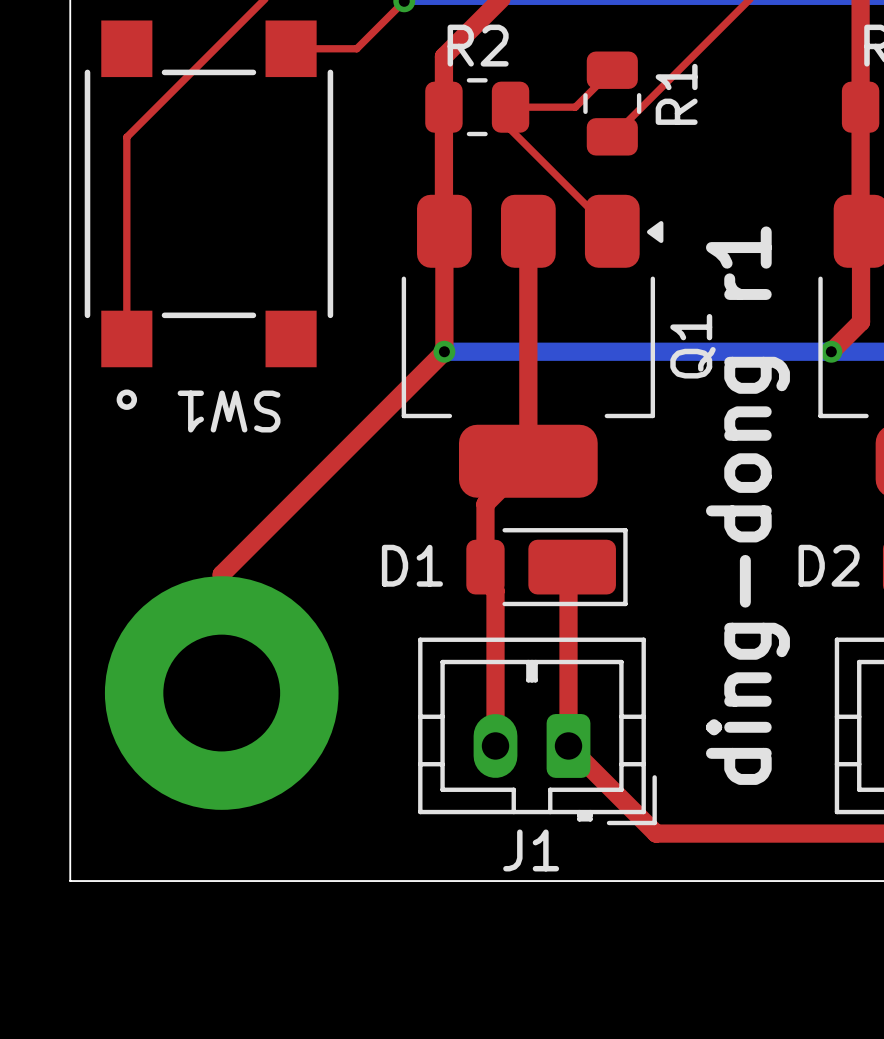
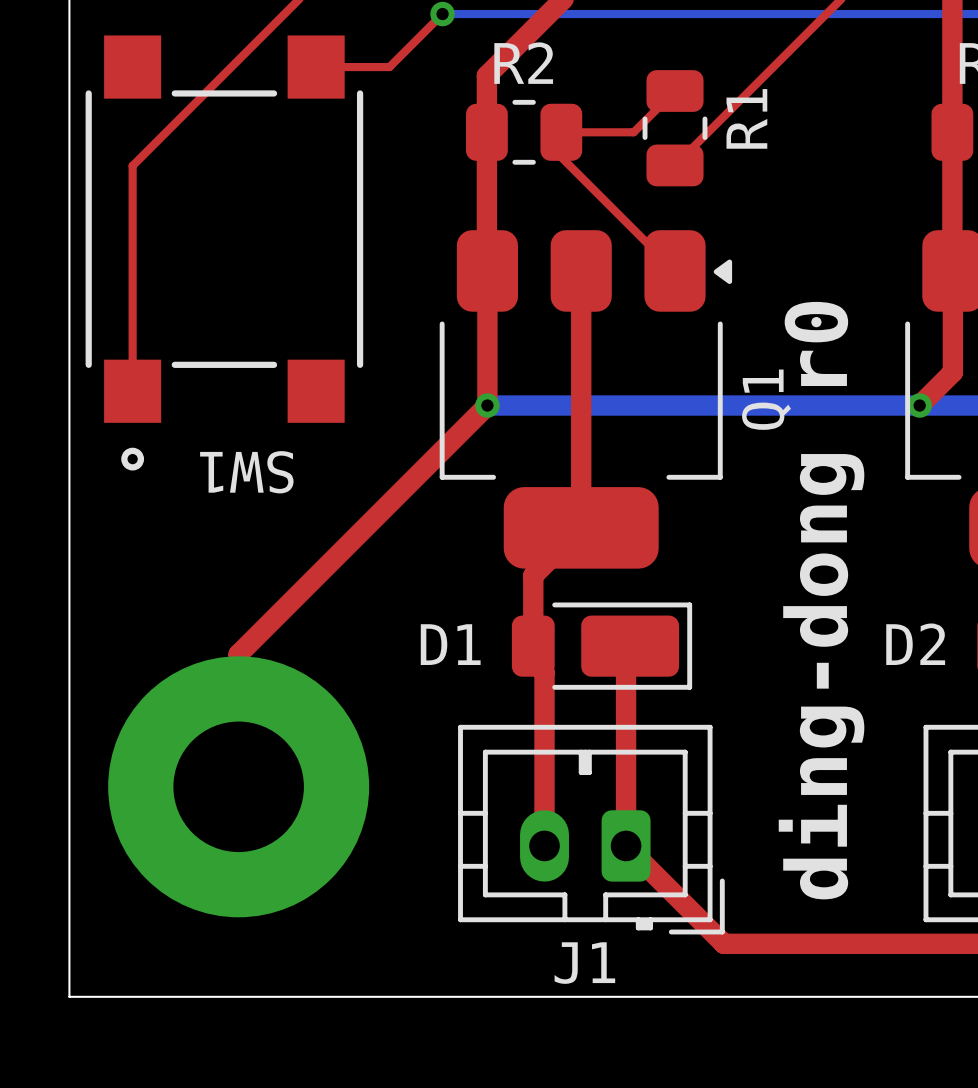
text: ding-dong r1 (747, 505) -> ding-dong r0 (821, 600)

